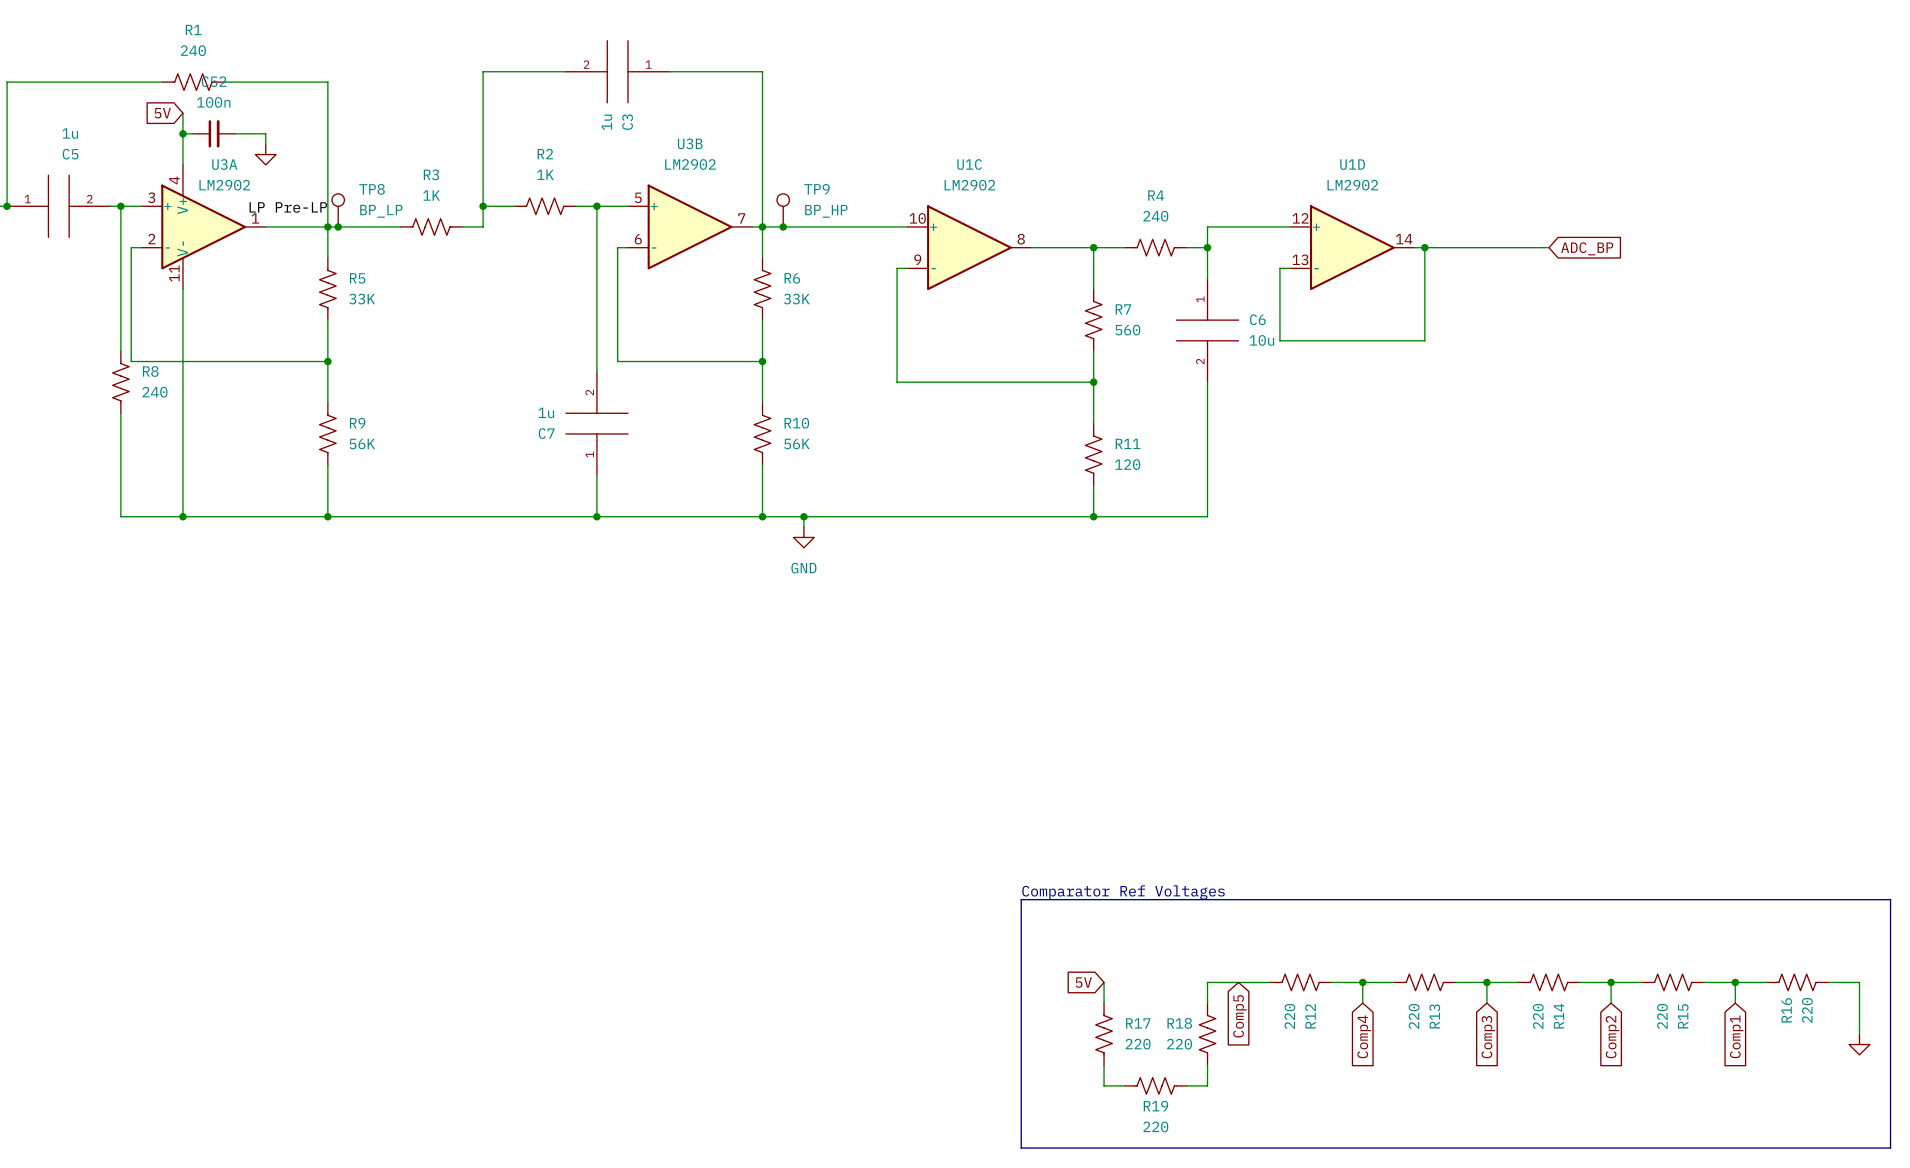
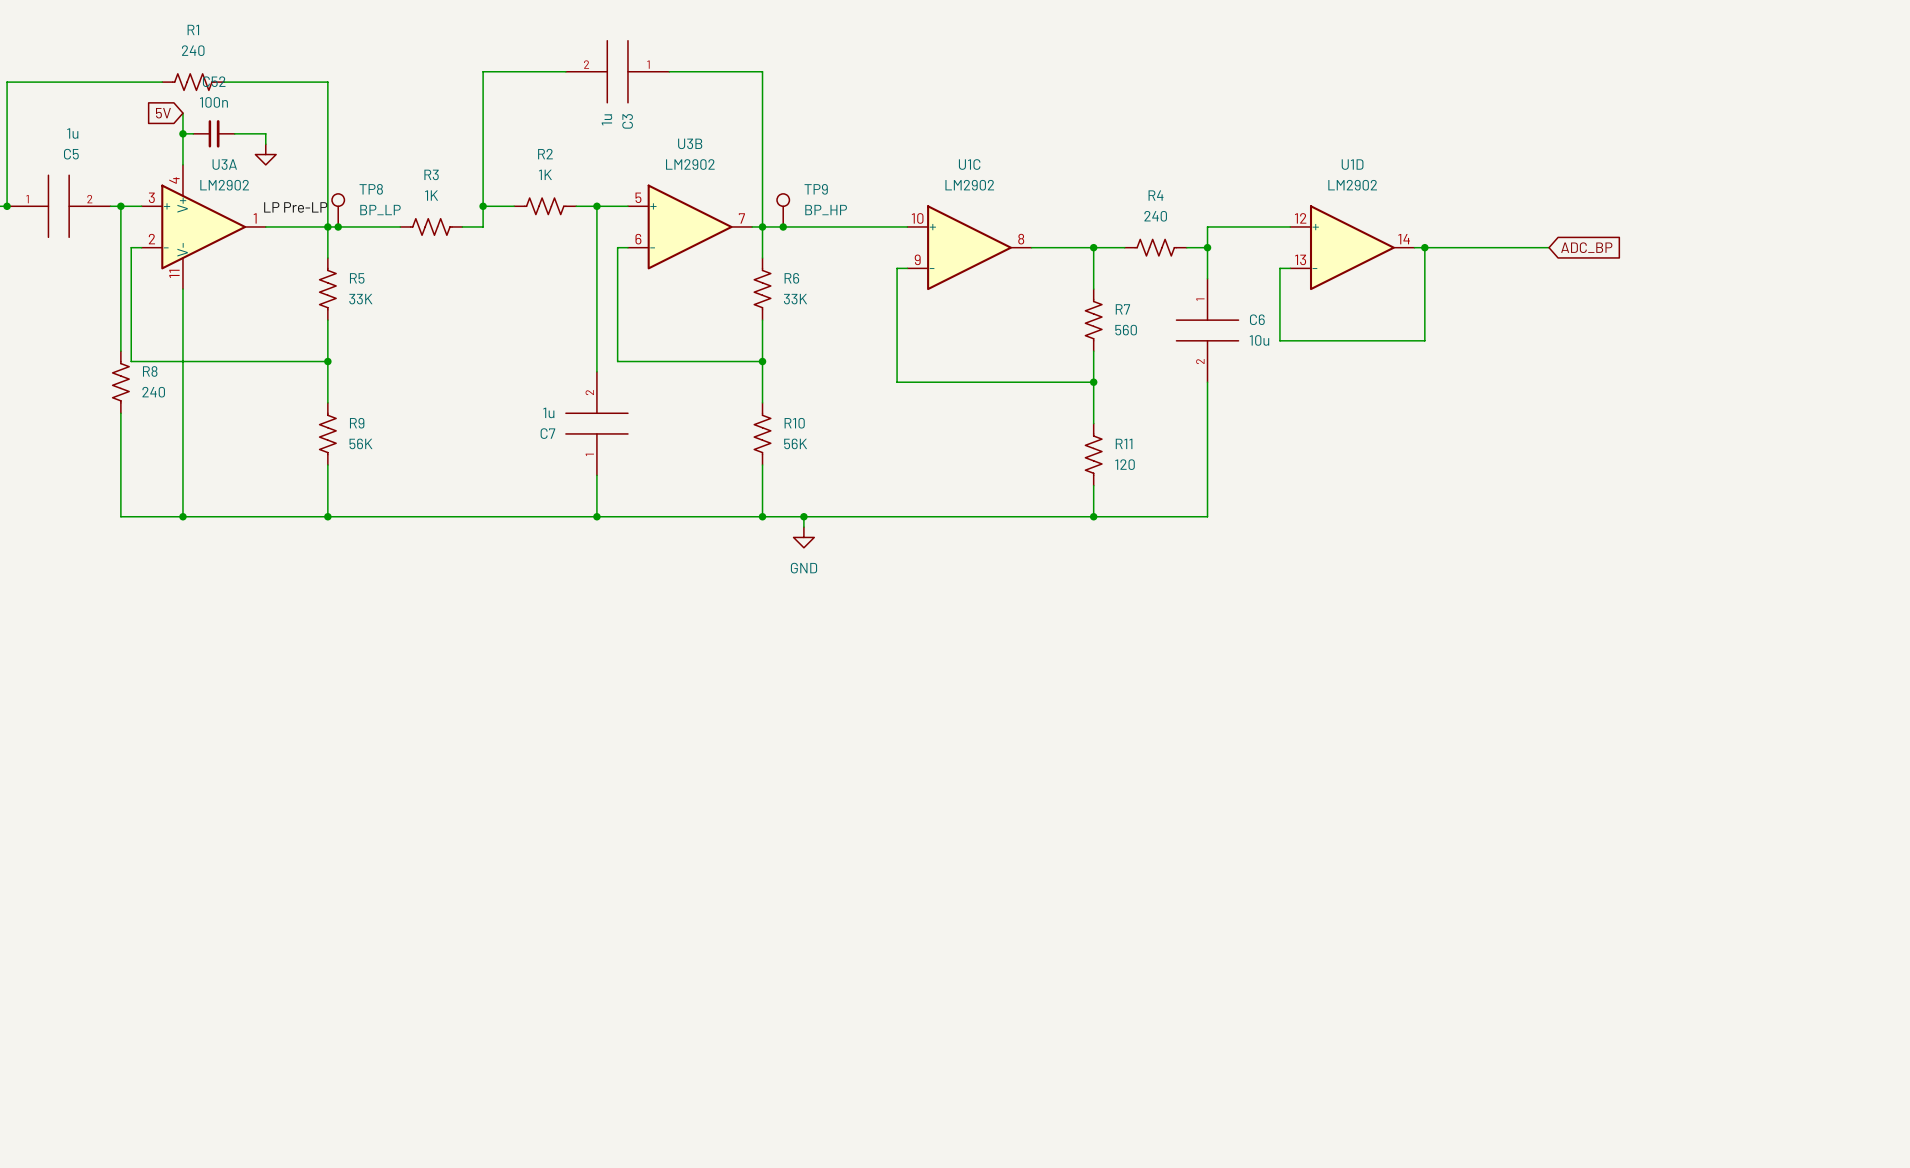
text: Comparator Ref Voltages (1123, 892) -> none
line: (1021, 899) (1890, 899) (1890, 1148) (1021, 1148) (1021, 899) -> none
global label: 5V (1083, 982) -> none
wire: (1104, 982) (1104, 1003) -> none
wire: (1269, 982) (1207, 982) (1207, 1003) -> none
R12: 220 (1300, 982) -> none
wire: (1331, 982) (1393, 982) -> none
wire: (1362, 982) (1362, 1003) -> none
junction: (1362, 982) -> none
R13: 220 (1424, 982) -> none
wire: (1455, 982) (1517, 982) -> none
wire: (1486, 982) (1486, 1003) -> none
junction: (1486, 982) -> none
R14: 220 (1549, 982) -> none
wire: (1580, 982) (1642, 982) -> none
wire: (1611, 982) (1611, 1003) -> none
junction: (1611, 982) -> none
R15: 220 (1673, 982) -> none
wire: (1704, 982) (1766, 982) -> none
wire: (1735, 982) (1735, 1003) -> none
junction: (1735, 982) -> none
R16: 220 (1797, 982) -> none
wire: (1828, 982) (1859, 982) (1859, 1034) -> none
global label: Comp5 (1239, 1016) -> none
R17: 220 (1104, 1034) -> none
R18: 220 (1207, 1034) -> none
global label: Comp4 (1364, 1036) -> none
global label: Comp2 (1612, 1036) -> none
global label: Comp1 (1736, 1036) -> none
global label: Comp3 (1488, 1037) -> none
power symbol: (1859, 1044) -> none
wire: (1104, 1065) (1104, 1085) (1124, 1085) -> none
wire: (1207, 1065) (1207, 1085) (1186, 1085) -> none
R19: 220 (1155, 1085) -> none

